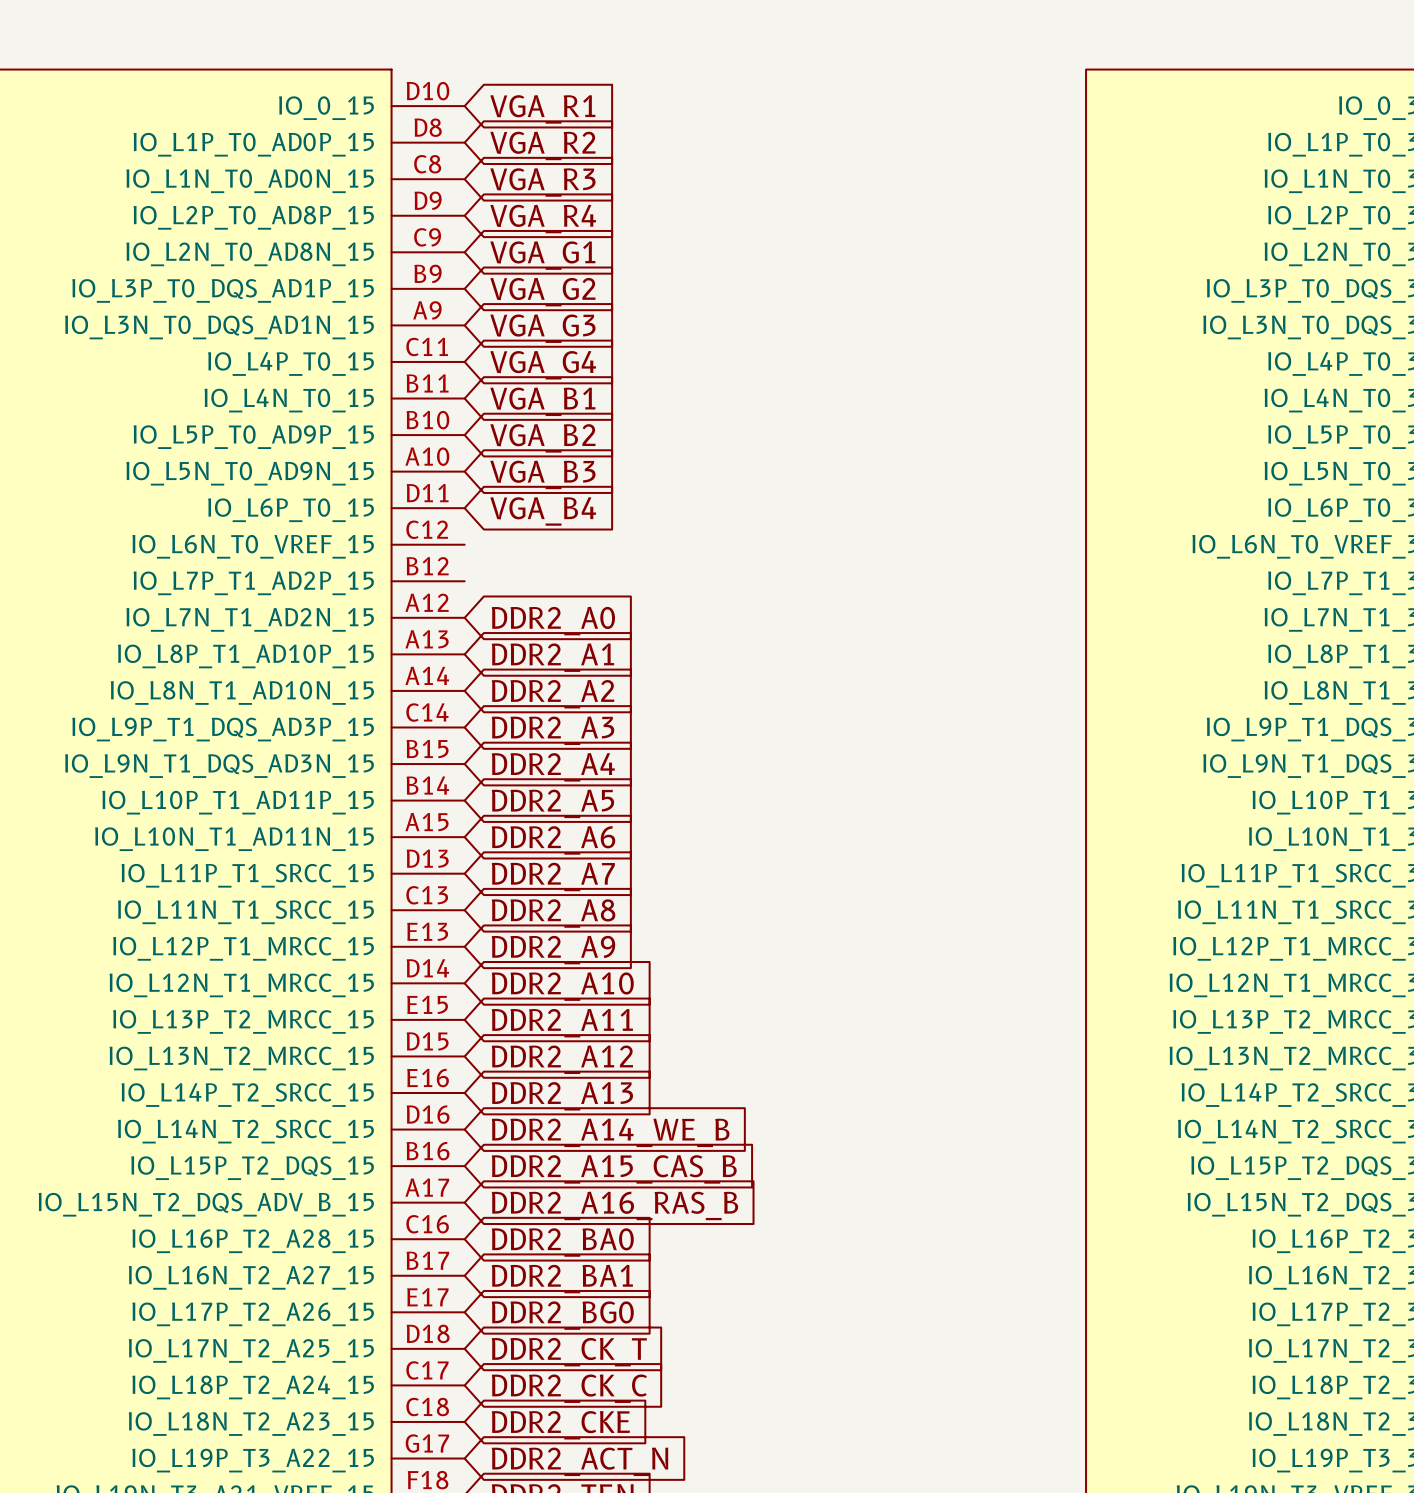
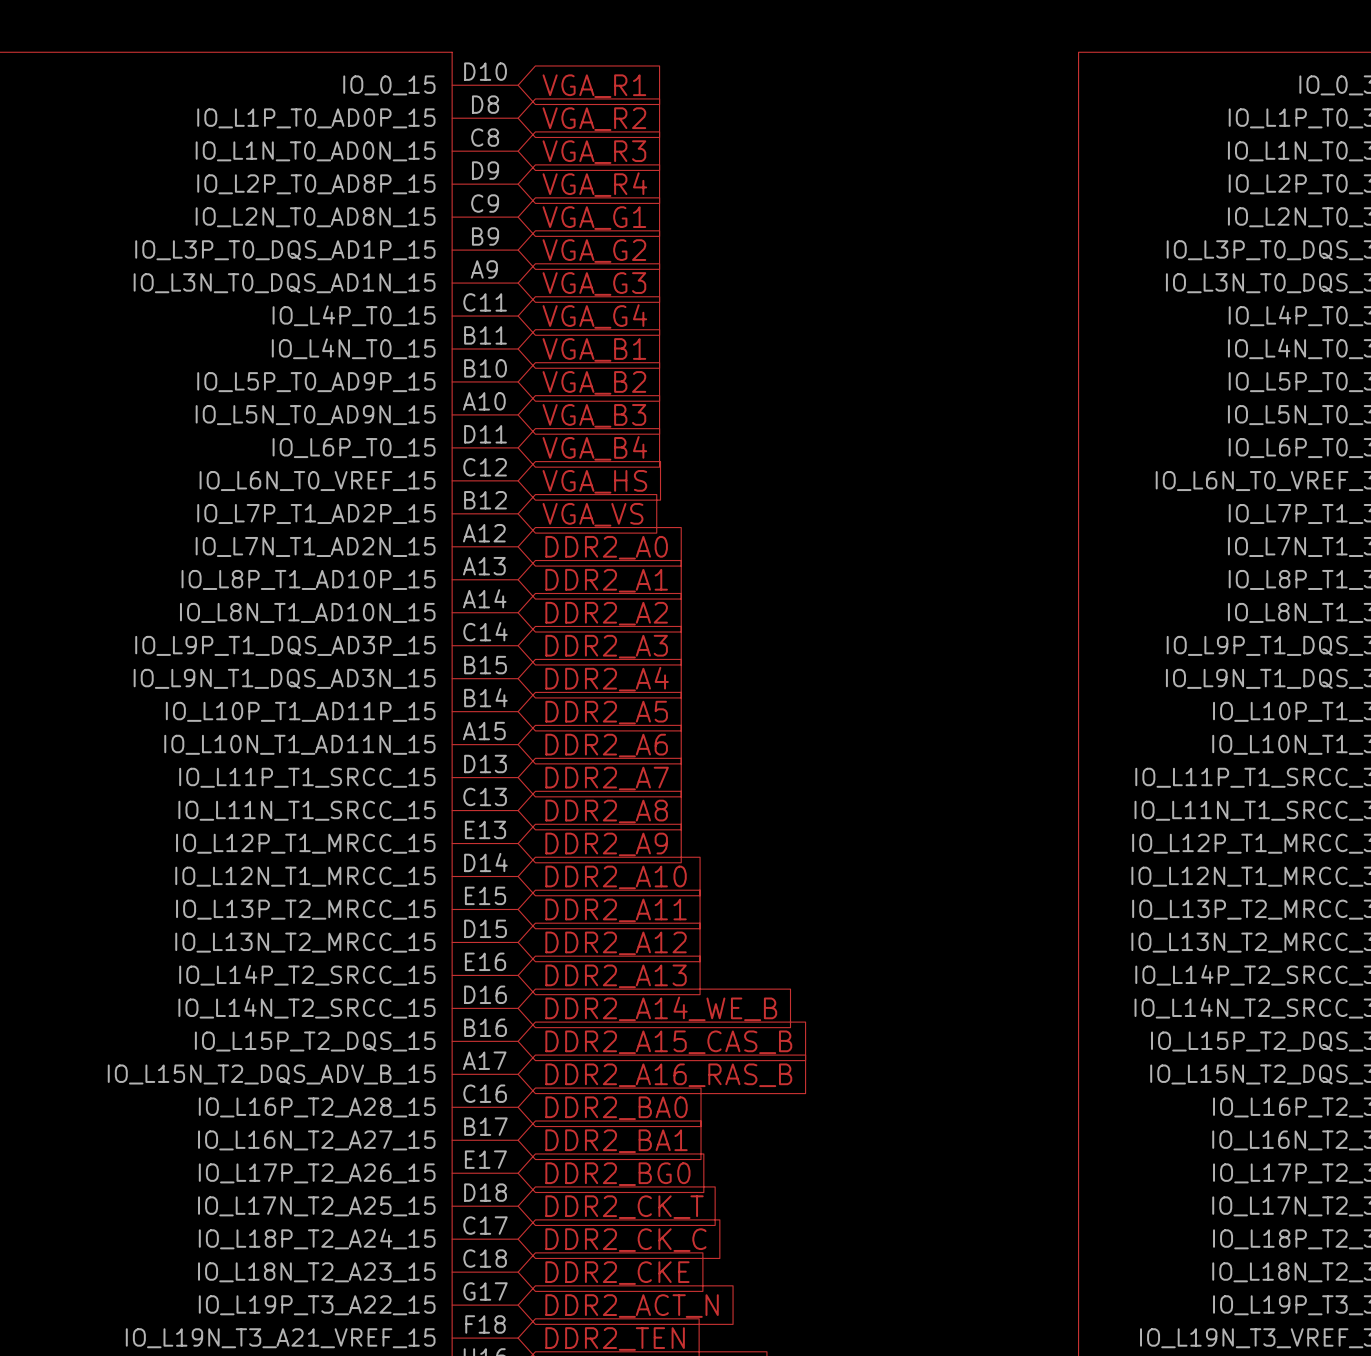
global label: none -> VGA_HS (594, 481)
global label: none -> VGA_VS (592, 514)

